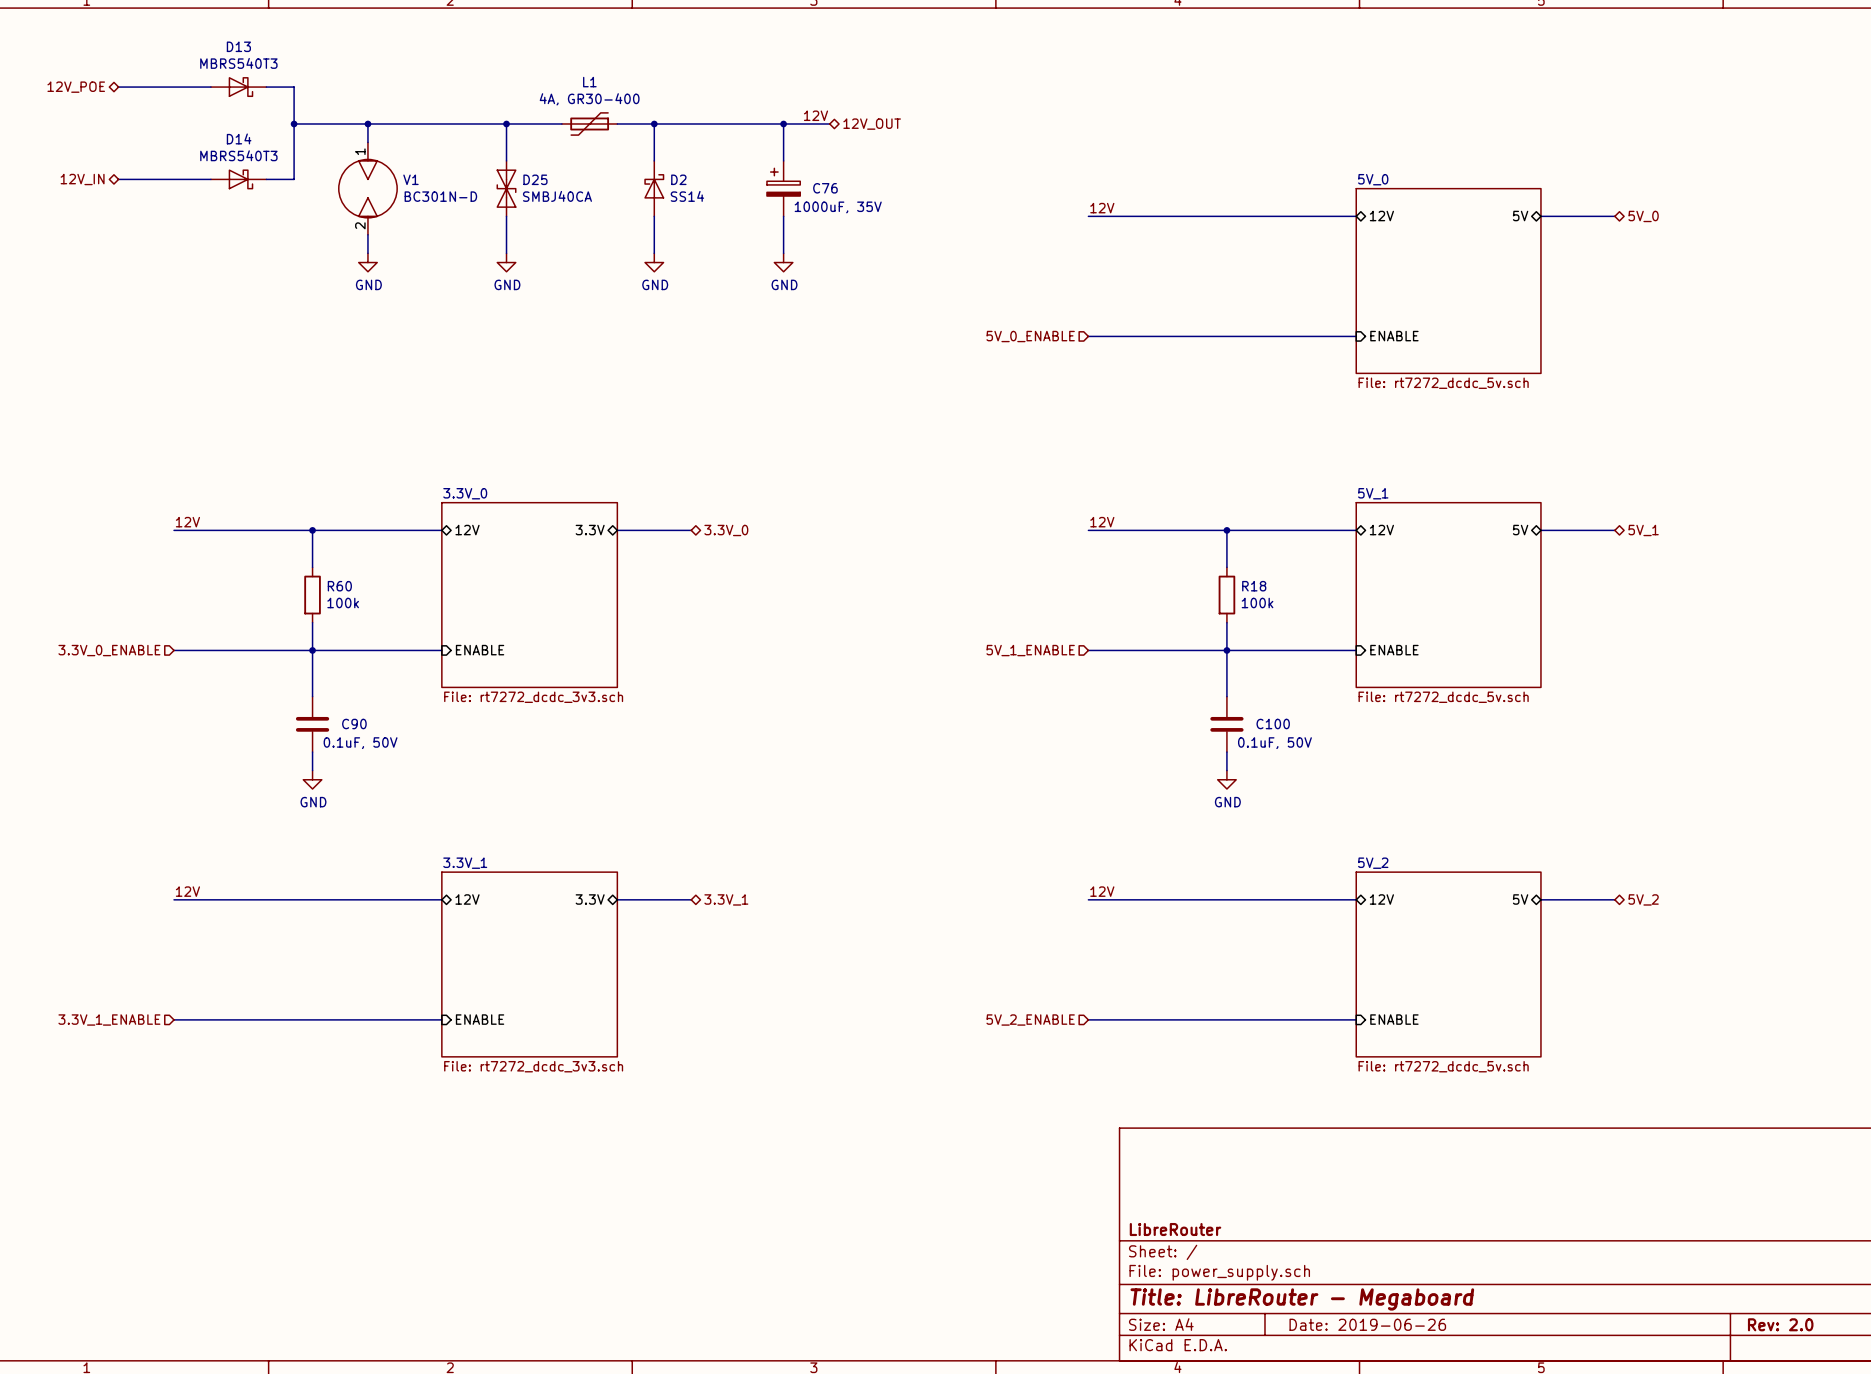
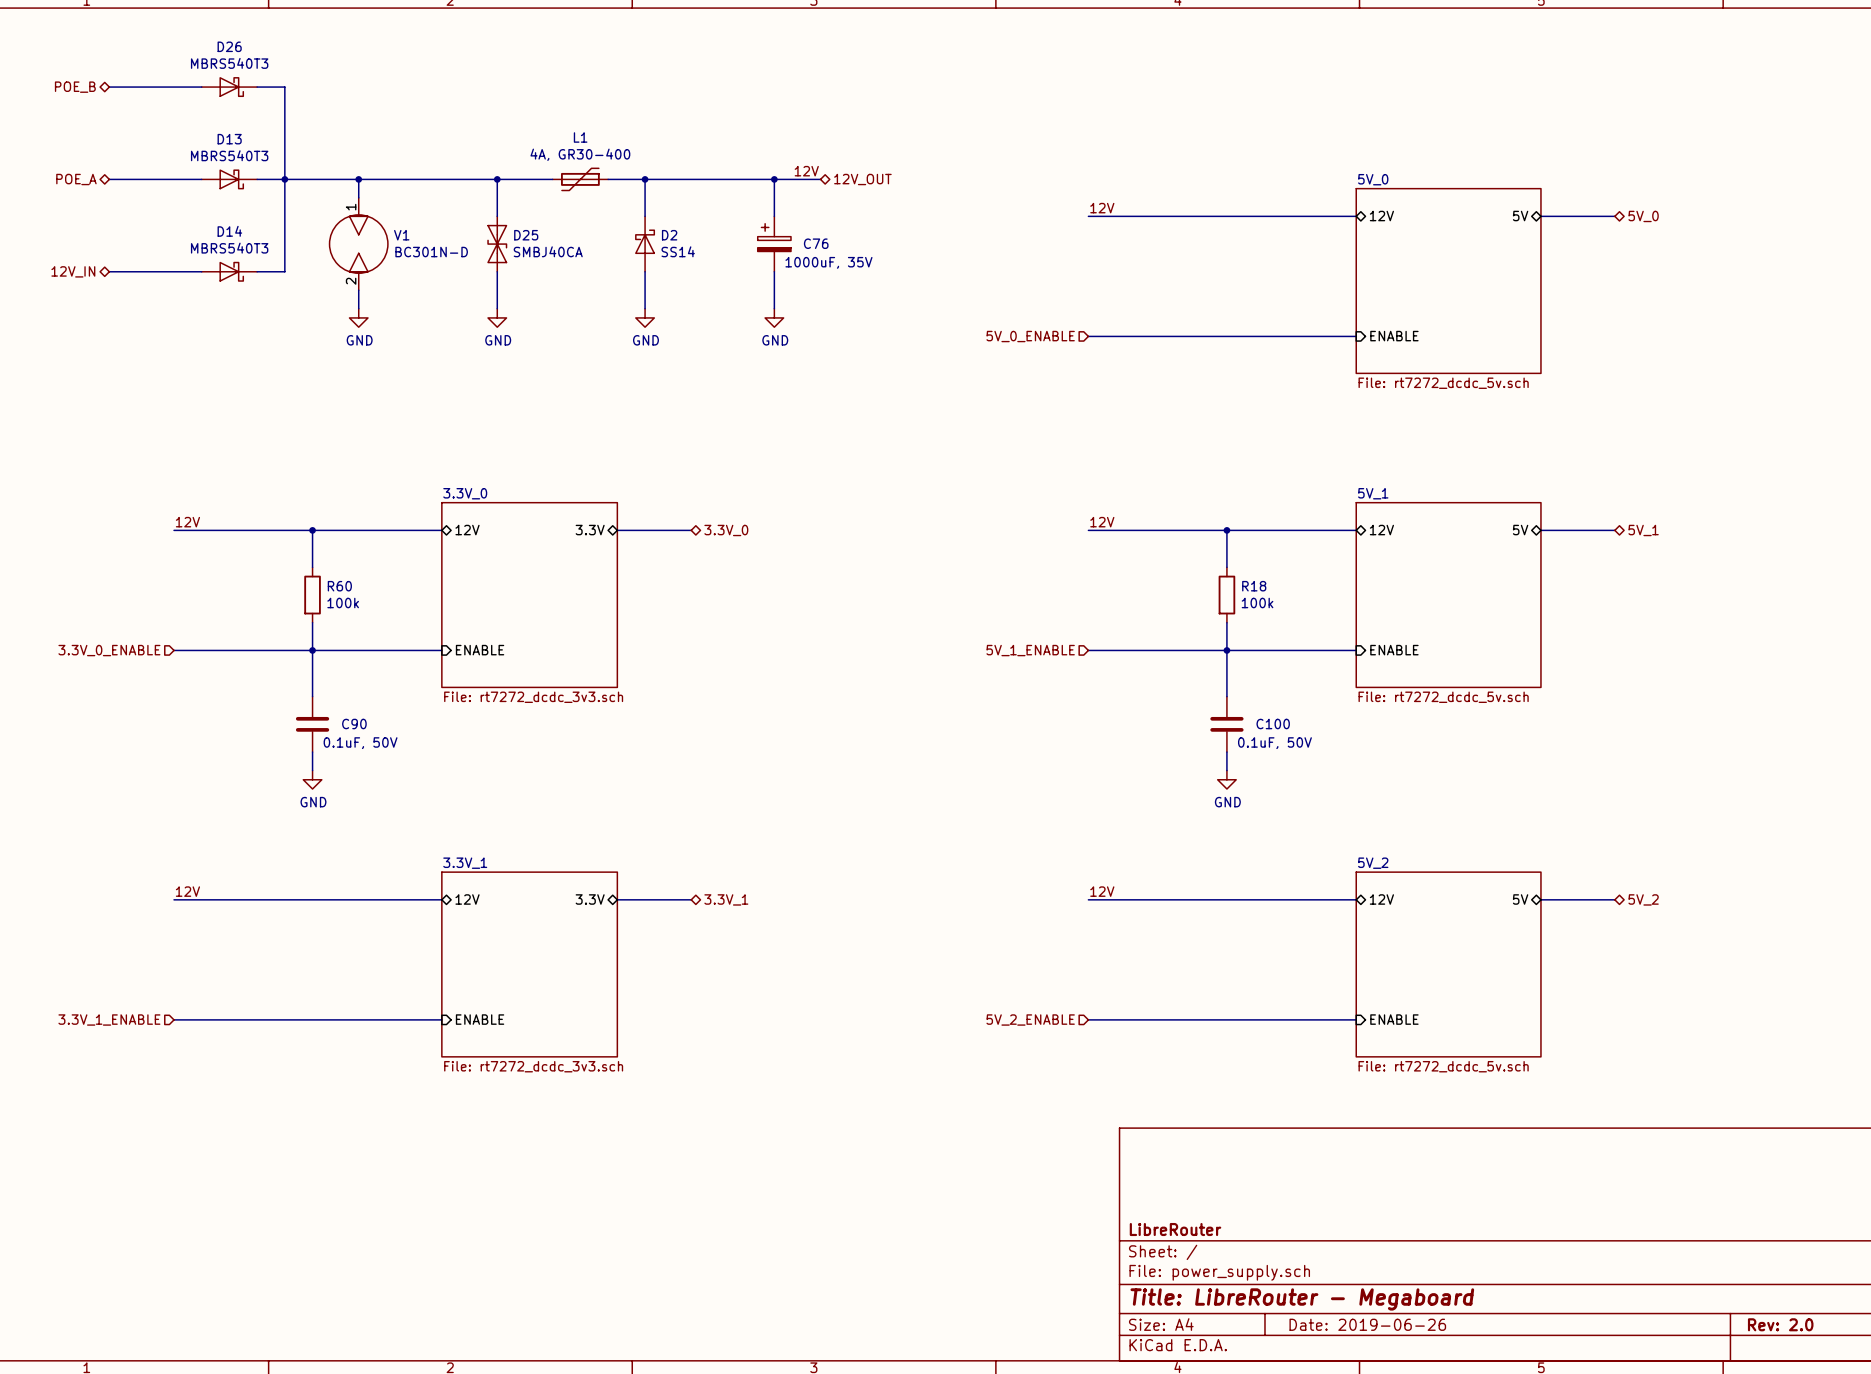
hierarchical label: none -> POE_B (75, 87)
hierarchical label: 12V_POE (76, 87) -> none
wire: none -> (109, 87) (118, 87)
D26: none -> MBRS540T3 (229, 87)
D13 position: (238, 87) -> (229, 179)
wire: (284, 87) (294, 87) (294, 179) -> (284, 87) (284, 271) (257, 271)
label position: 12V (815, 115) -> 12V (806, 171)
wire: (294, 123) (561, 123) -> none
junction: (294, 123) -> none
wire: (367, 123) (367, 142) -> (358, 179) (358, 197)
junction: (367, 123) -> none
wire: (506, 123) (506, 160) -> (497, 179) (497, 216)
junction: (506, 123) -> none
L1 position: (589, 123) -> (580, 179)
wire: (617, 123) (829, 123) -> (608, 179) (820, 179)
wire: (654, 123) (654, 160) -> (645, 179) (645, 216)
junction: (654, 123) -> none
wire: (783, 123) (783, 160) -> (774, 179) (774, 216)
junction: (783, 123) -> none
hierarchical label position: 12V_OUT (872, 124) -> 12V_OUT (862, 179)
hierarchical label: none -> POE_A (76, 179)
hierarchical label position: 12V_IN (82, 179) -> 12V_IN (73, 271)
wire: none -> (109, 179) (118, 179)
D14 position: (238, 179) -> (229, 271)
junction: none -> (284, 179)
wire: none -> (294, 179) (552, 179)
junction: none -> (358, 179)
junction: none -> (497, 179)
junction: none -> (645, 179)
junction: none -> (774, 179)
V1 position: (367, 188) -> (358, 244)
D25 position: (506, 188) -> (497, 244)
D2 position: (654, 188) -> (645, 244)
C76 position: (783, 188) -> (774, 244)
wire: (506, 216) (506, 253) -> (497, 271) (497, 308)
wire: (654, 216) (654, 253) -> (645, 271) (645, 308)
wire: (783, 216) (783, 253) -> (774, 271) (774, 308)
wire: (367, 234) (367, 253) -> (358, 290) (358, 308)
power symbol position: GND (367, 262) -> GND (358, 317)
power symbol position: GND (506, 262) -> GND (497, 317)
power symbol position: GND (654, 262) -> GND (645, 317)
power symbol position: GND (783, 262) -> GND (774, 317)
wire: none -> (109, 271) (201, 271)

